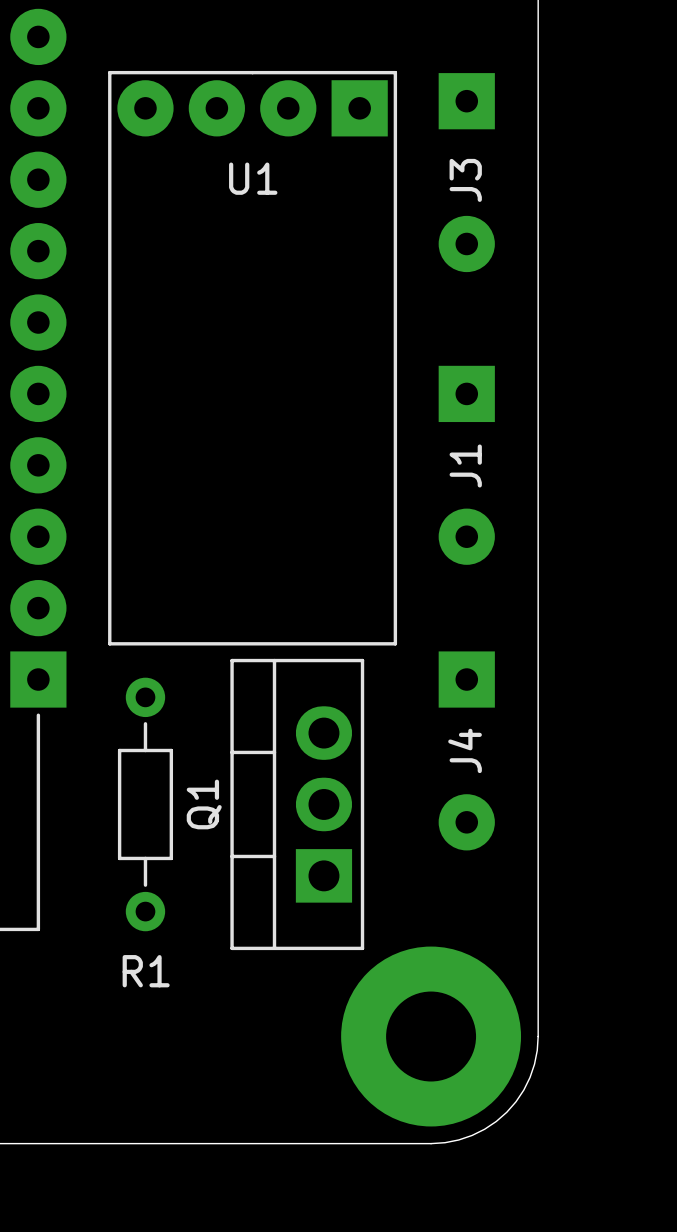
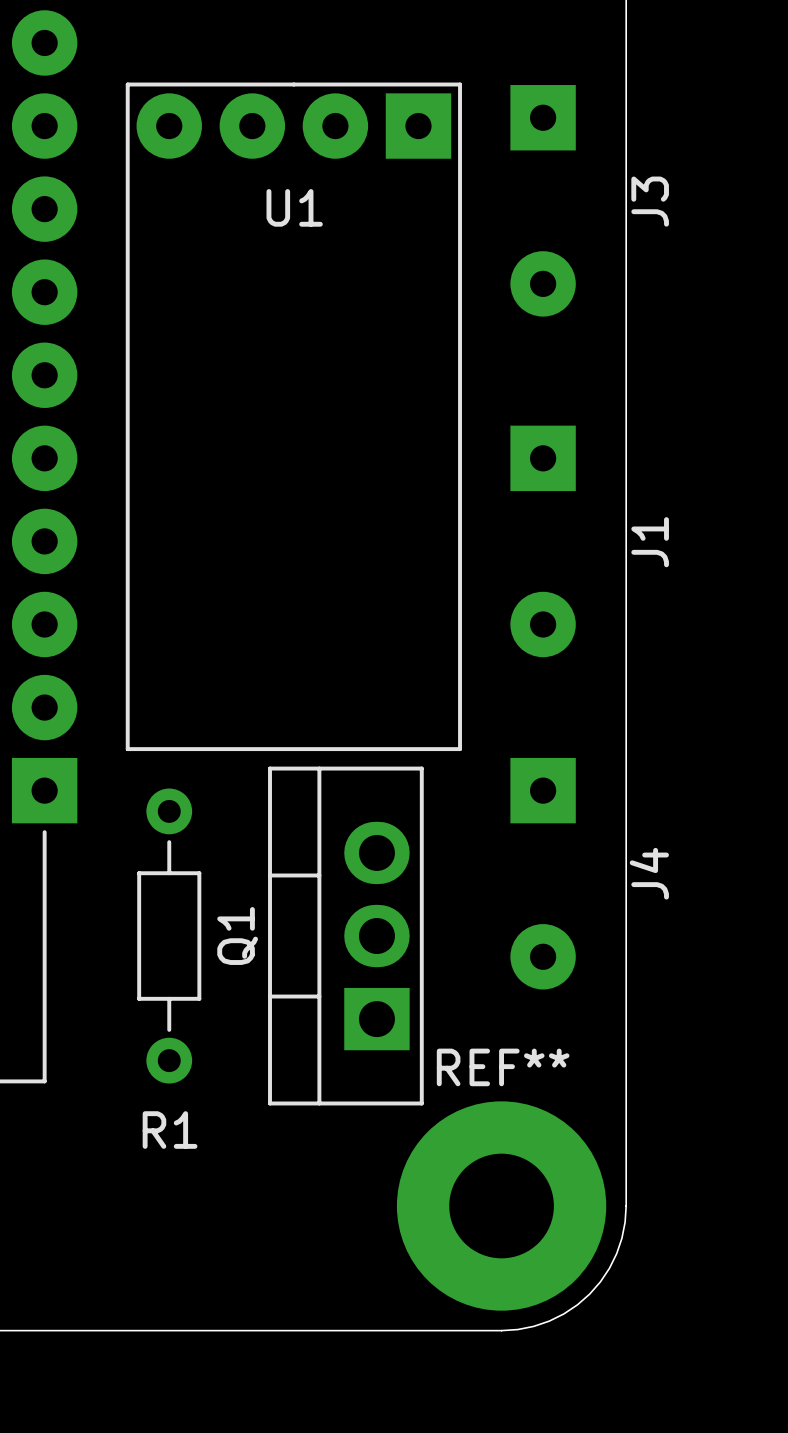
J3 name position: J3 (465, 180) -> J3 (650, 201)
J1 name position: J1 (465, 465) -> J1 (650, 542)
J4 name position: J4 (465, 750) -> J4 (649, 873)
REF** name: none -> REF** (503, 1067)

